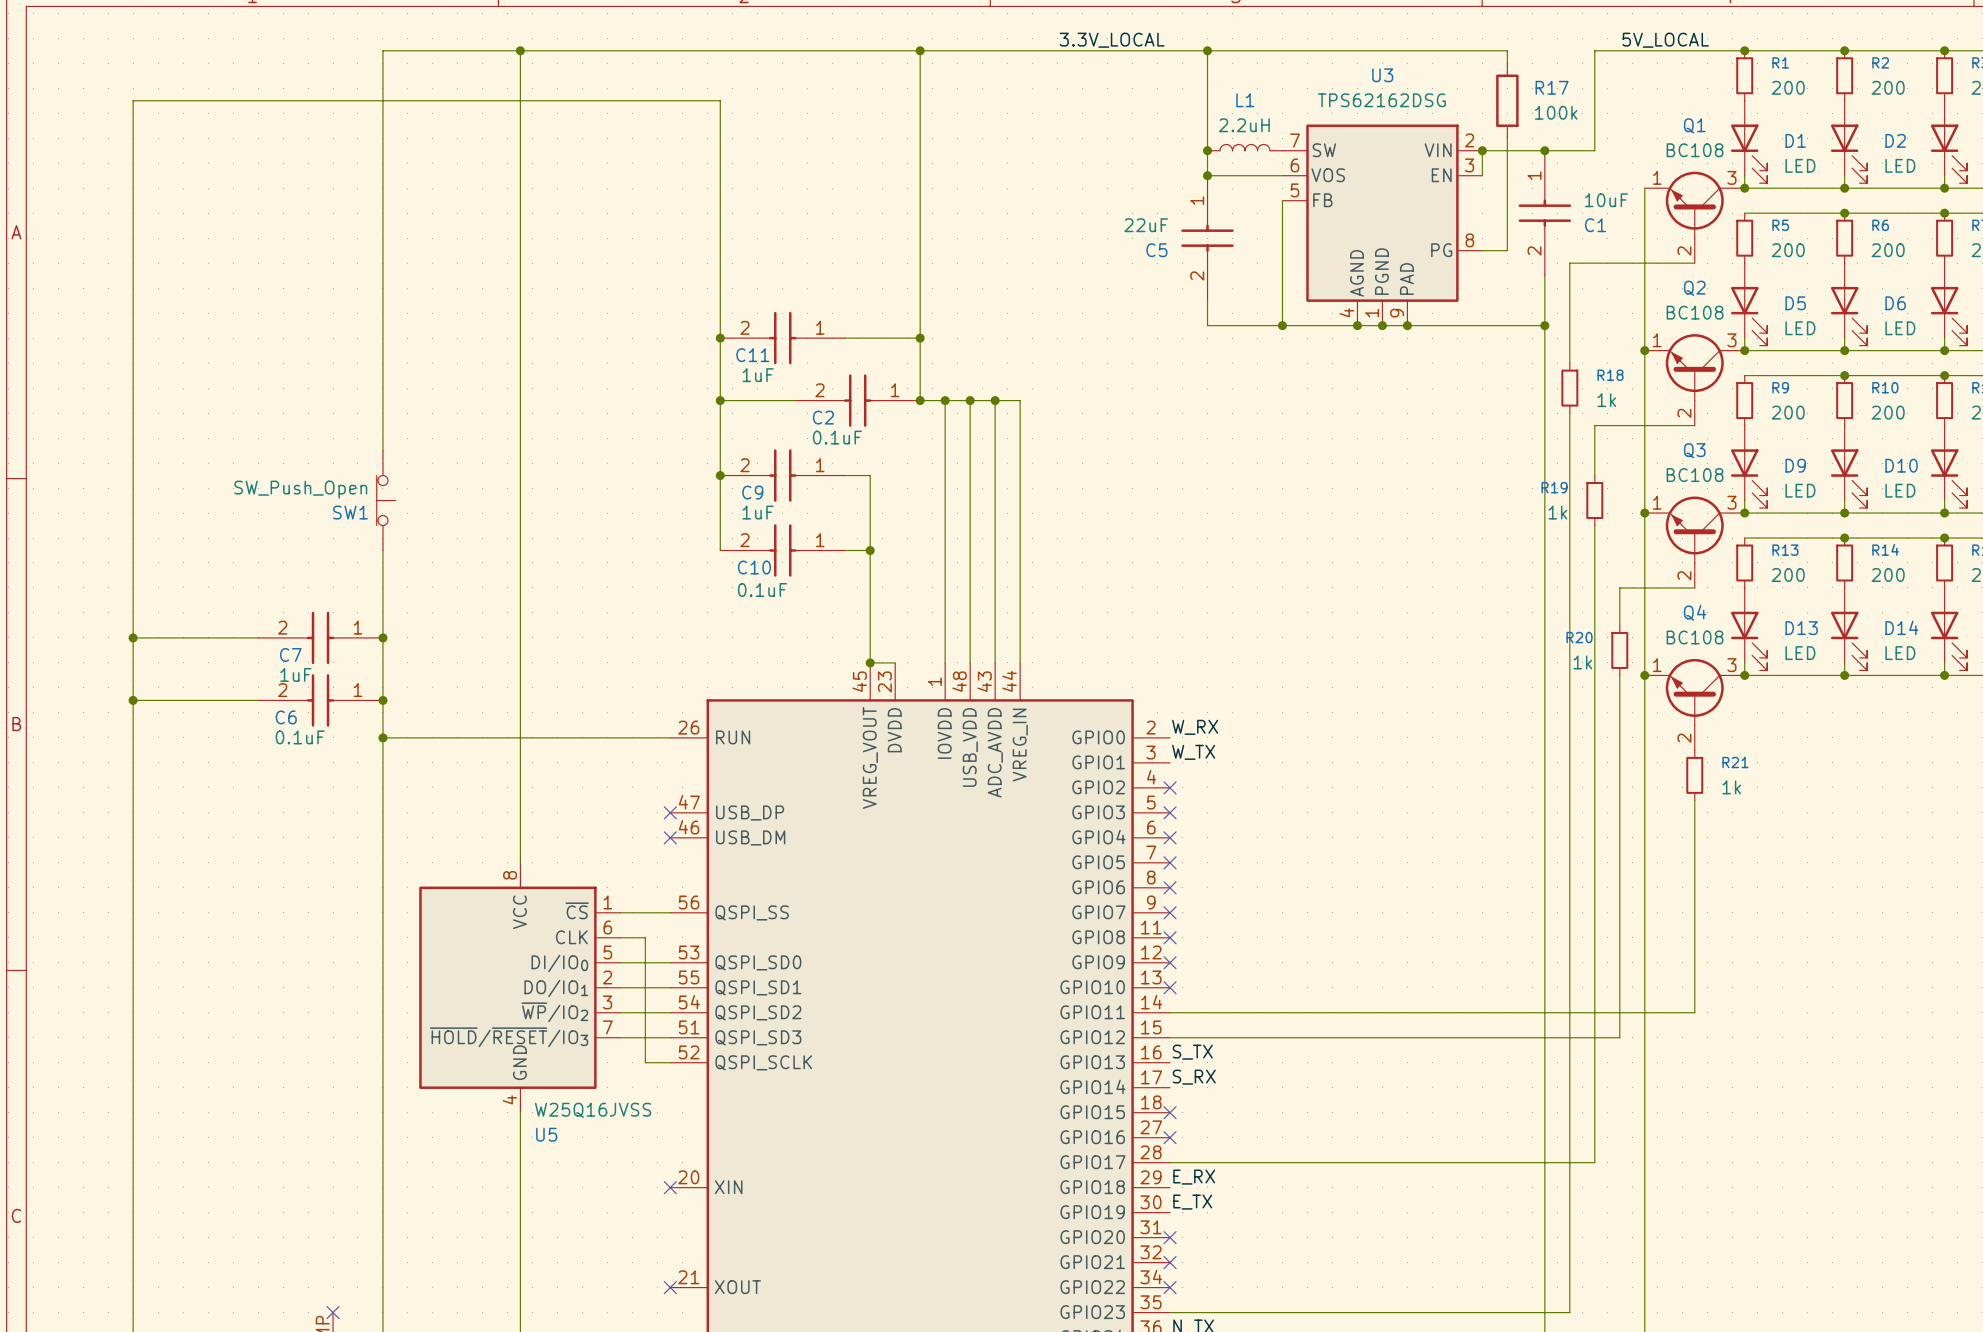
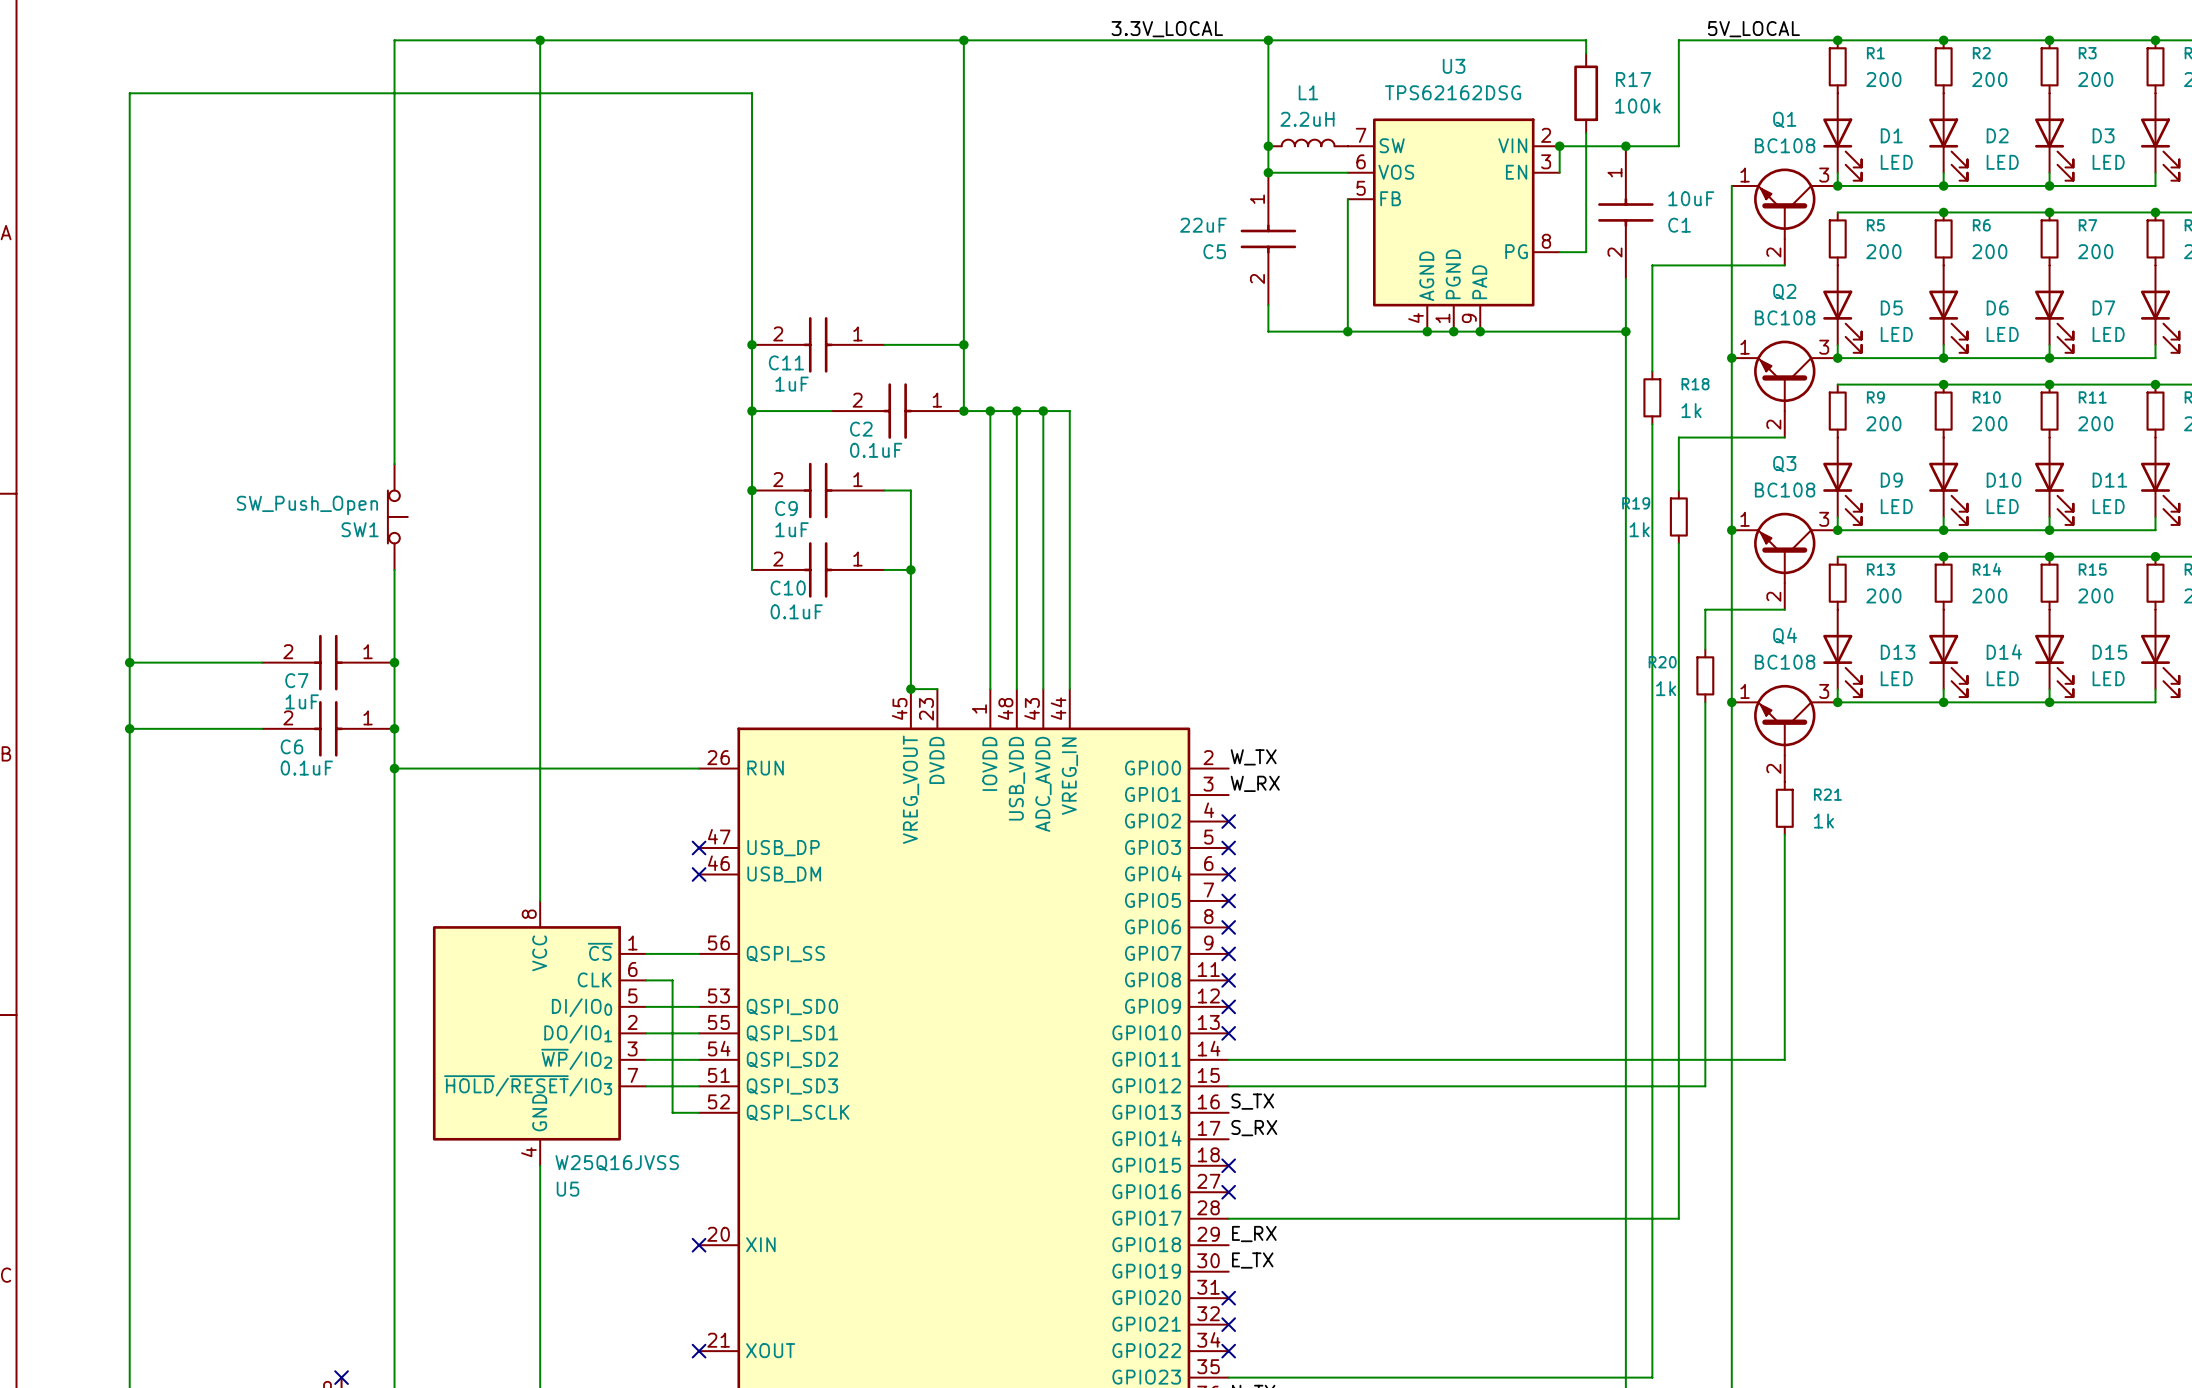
label: W_RX (1195, 727) -> W_TX (1253, 757)
label: W_TX (1193, 752) -> W_RX (1255, 783)

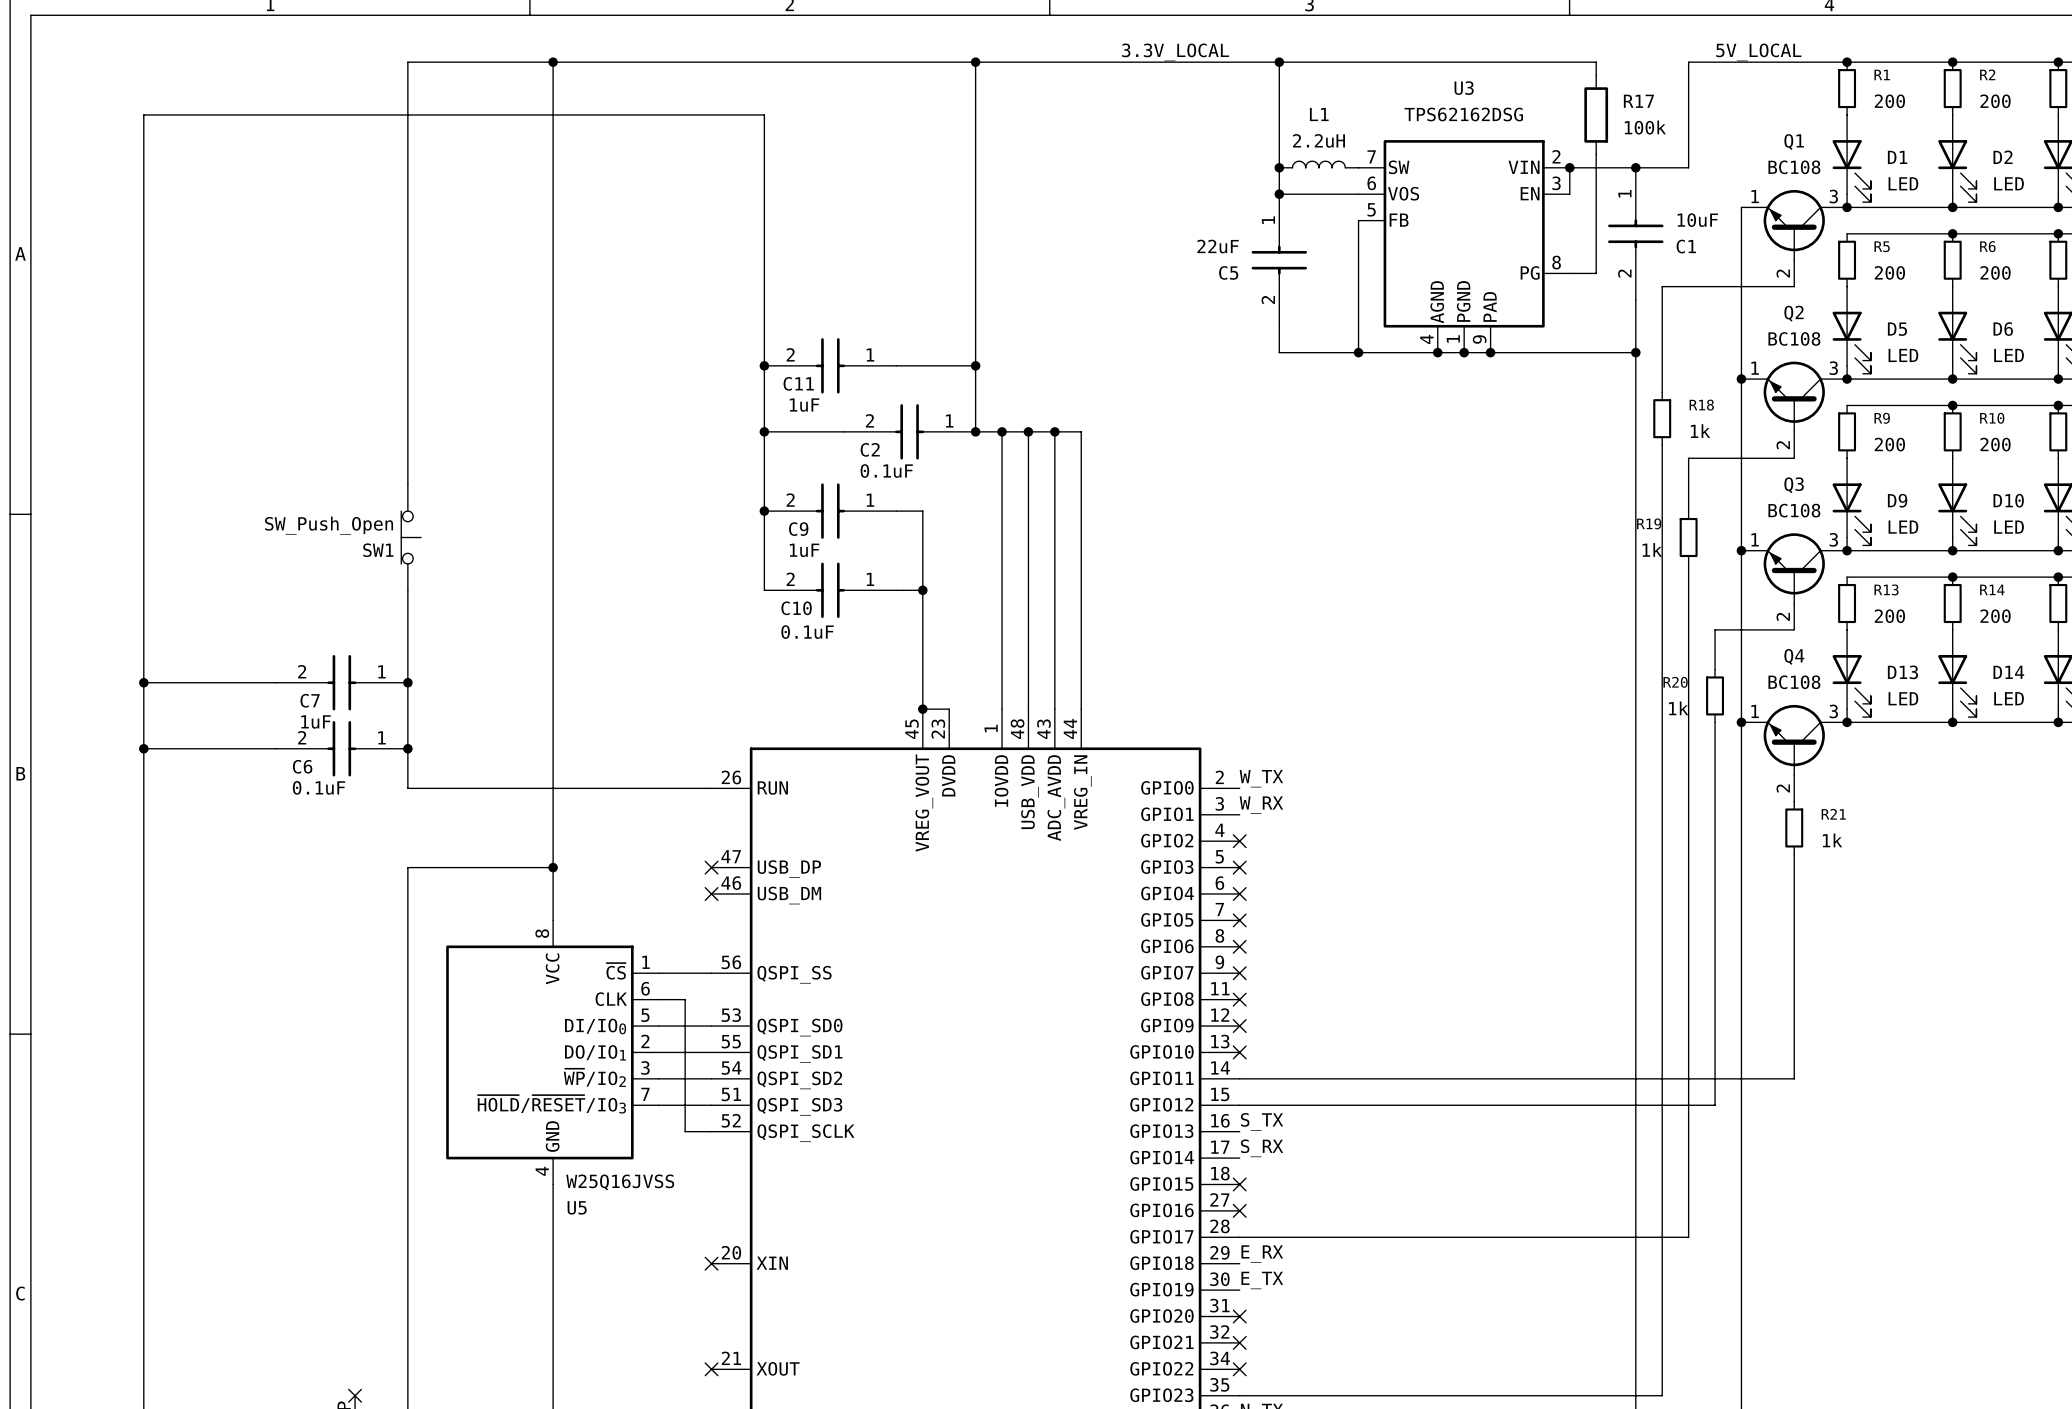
wire: (394, 768) (394, 848) -> (553, 867) (407, 867)
junction: (394, 768) -> none
junction: none -> (553, 867)

